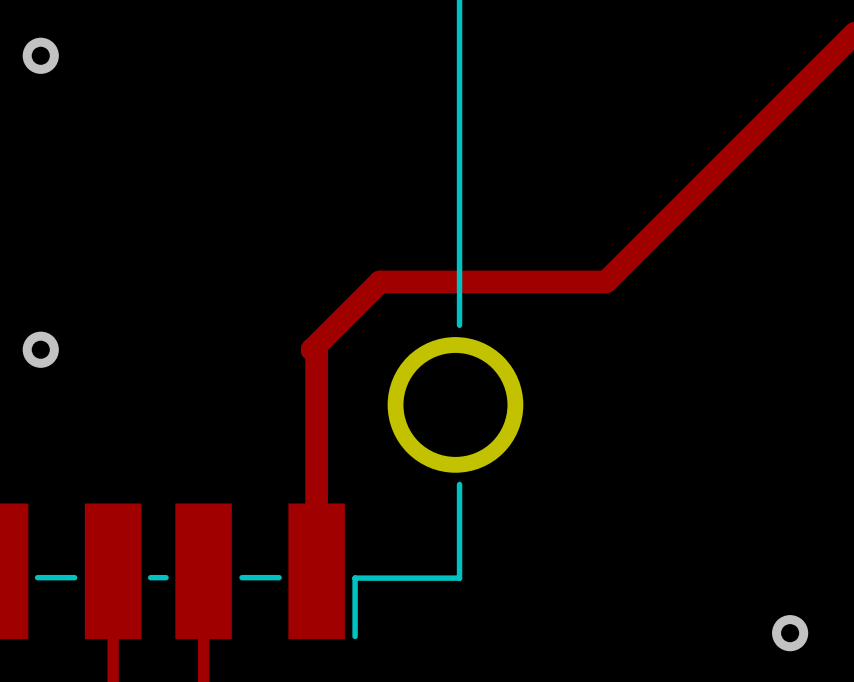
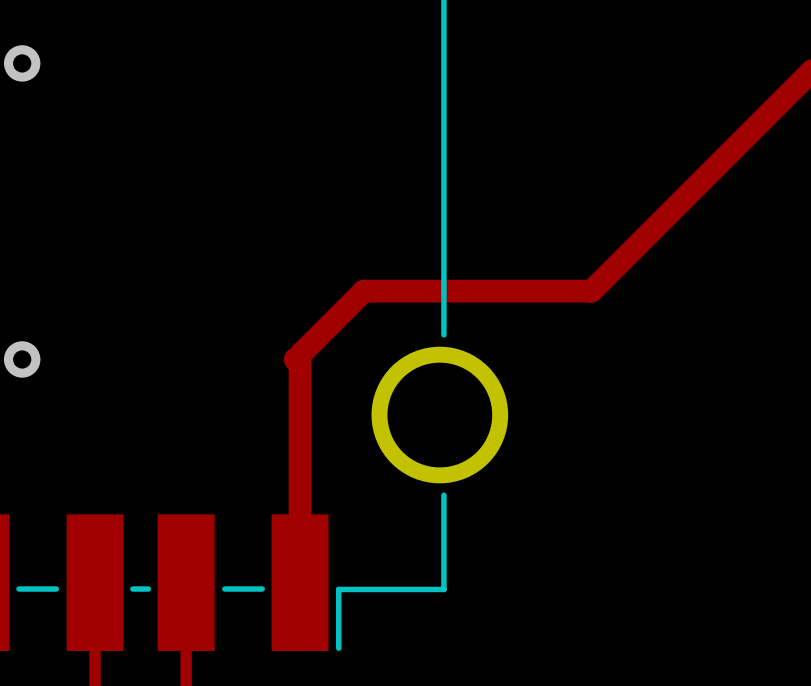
via: (790, 633) -> none

